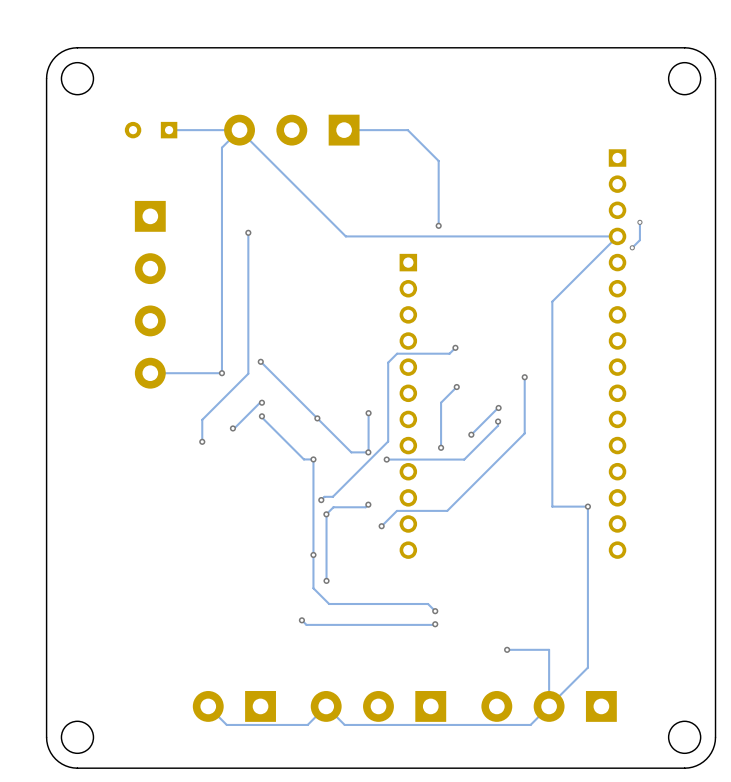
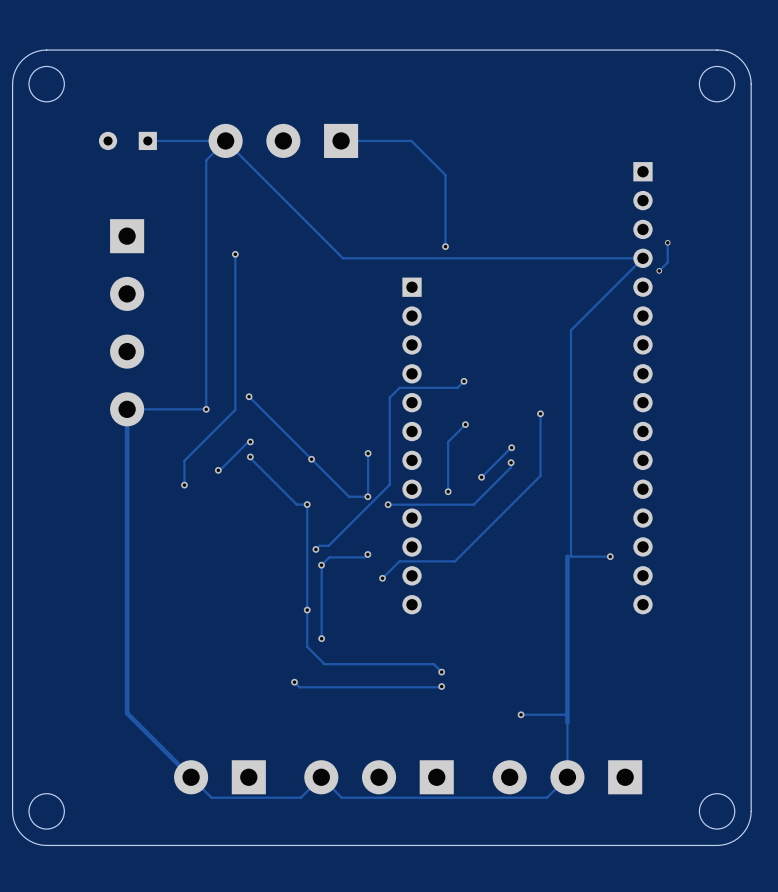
track: none -> (127, 409) (127, 713) (191, 777)
track: none -> (567, 556) (567, 722)
track: (587, 506) (587, 667) (549, 706) -> none

